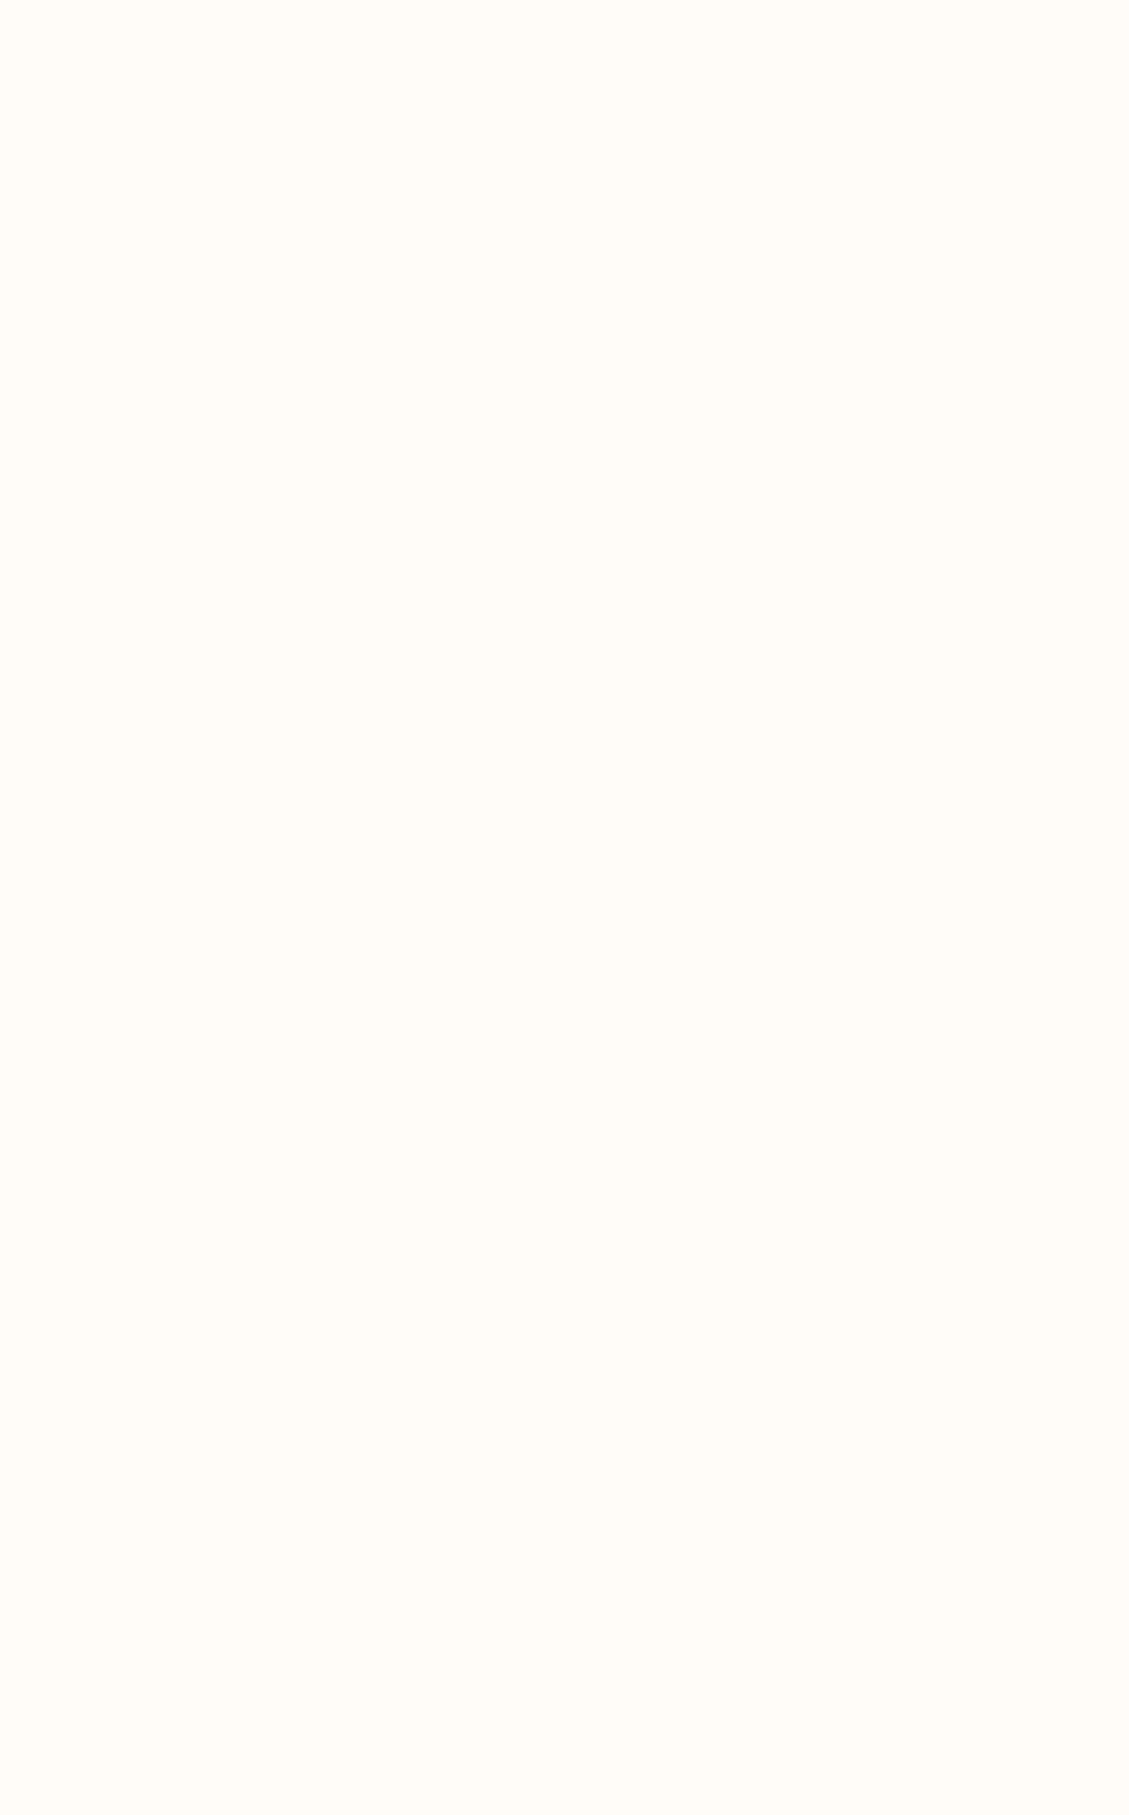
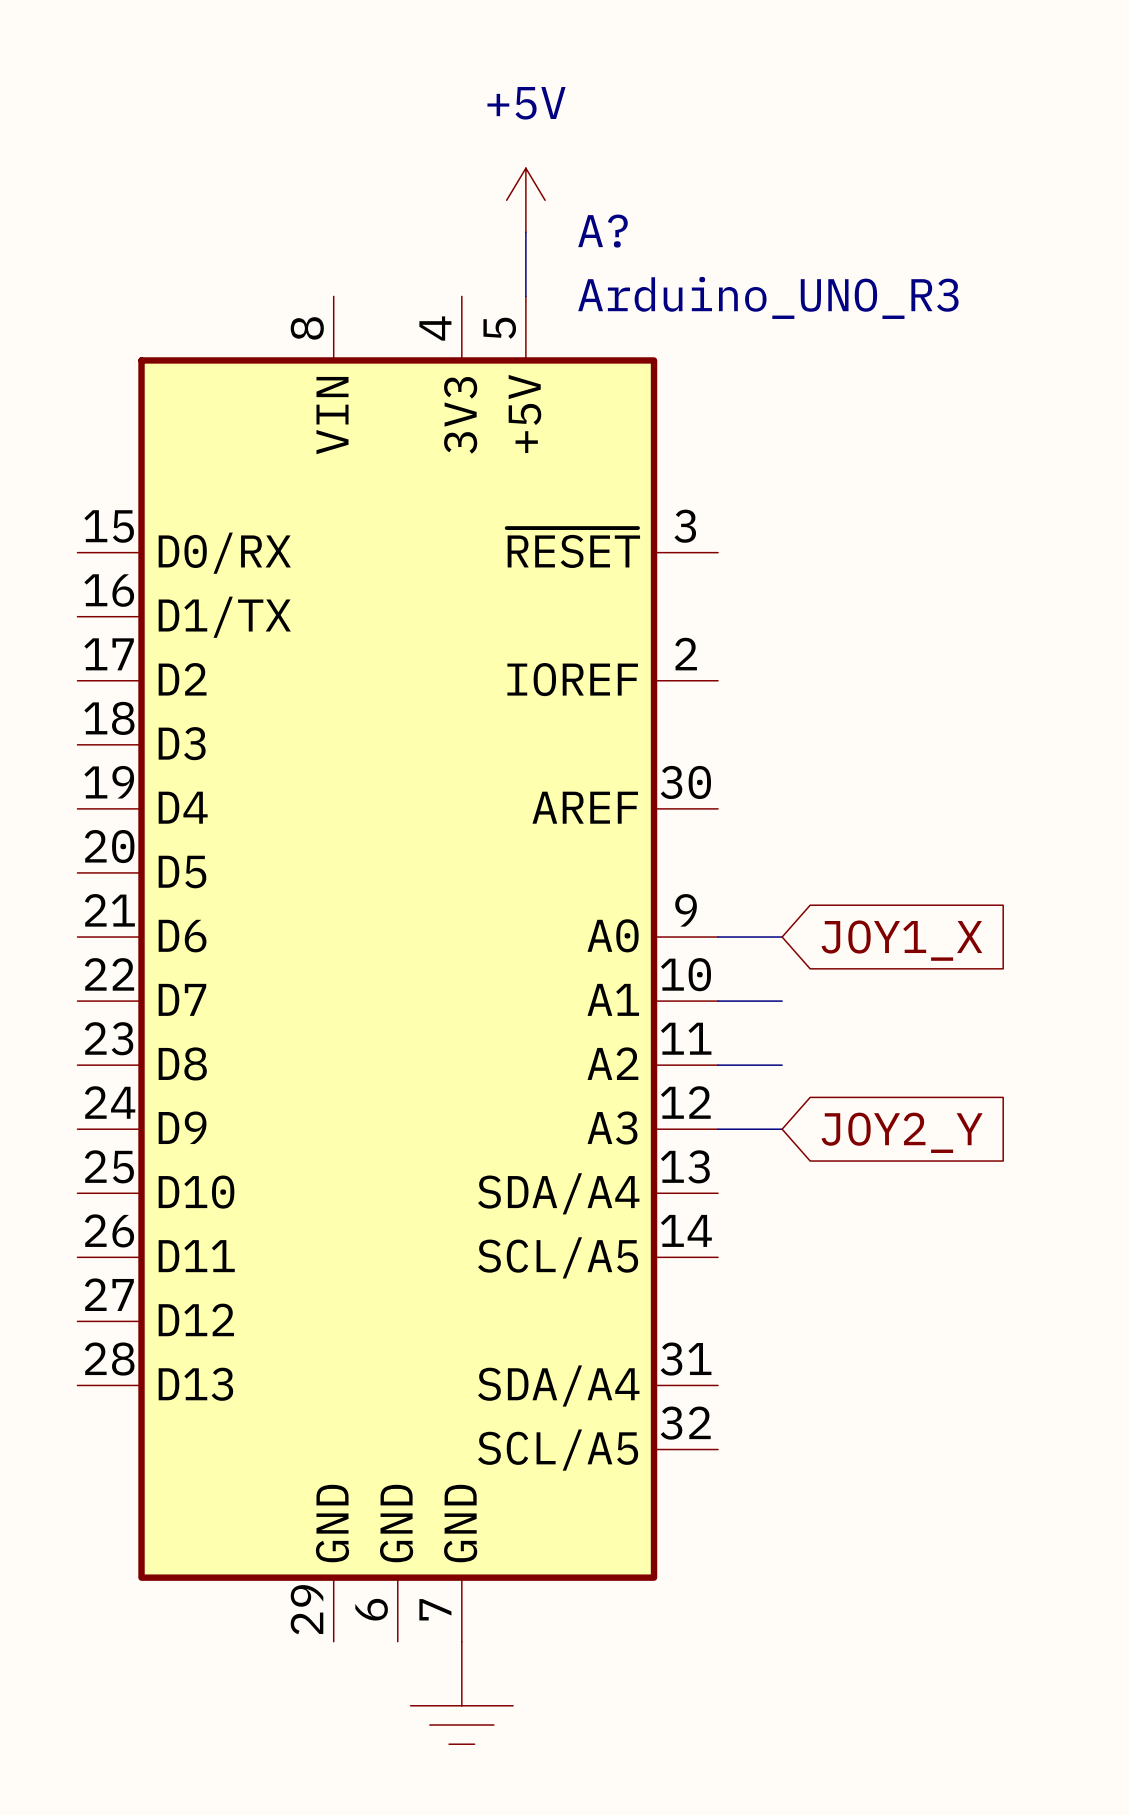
power symbol: none -> +5V (525, 200)
wire: none -> (525, 232) (525, 296)
wire: none -> (718, 937) (782, 937)
global label: none -> JOY1_X (901, 940)
A?: none -> Arduino_UNO_R3 (397, 969)
wire: none -> (718, 1001) (782, 1001)
wire: none -> (718, 1065) (782, 1065)
wire: none -> (718, 1129) (782, 1129)
global label: none -> JOY2_Y (902, 1132)
power symbol: none -> (461, 1692)

